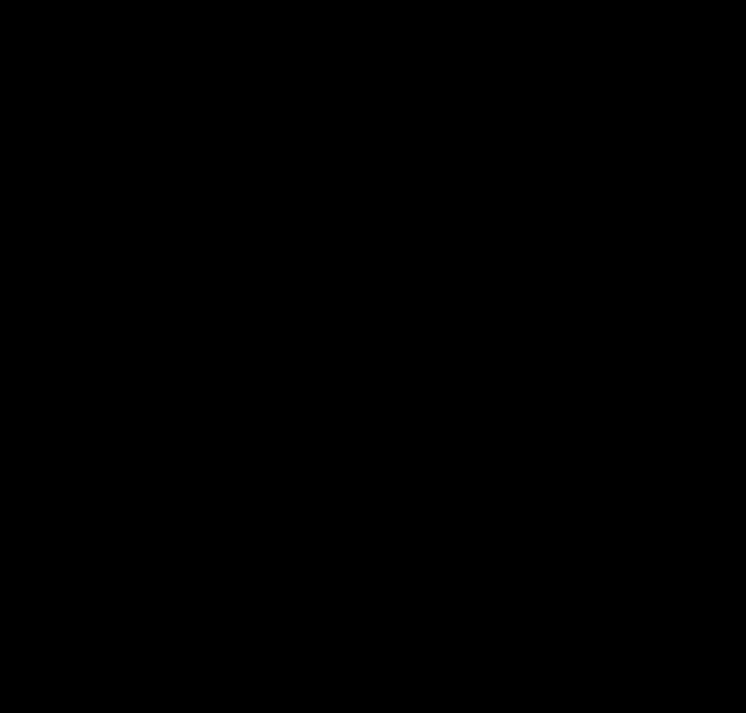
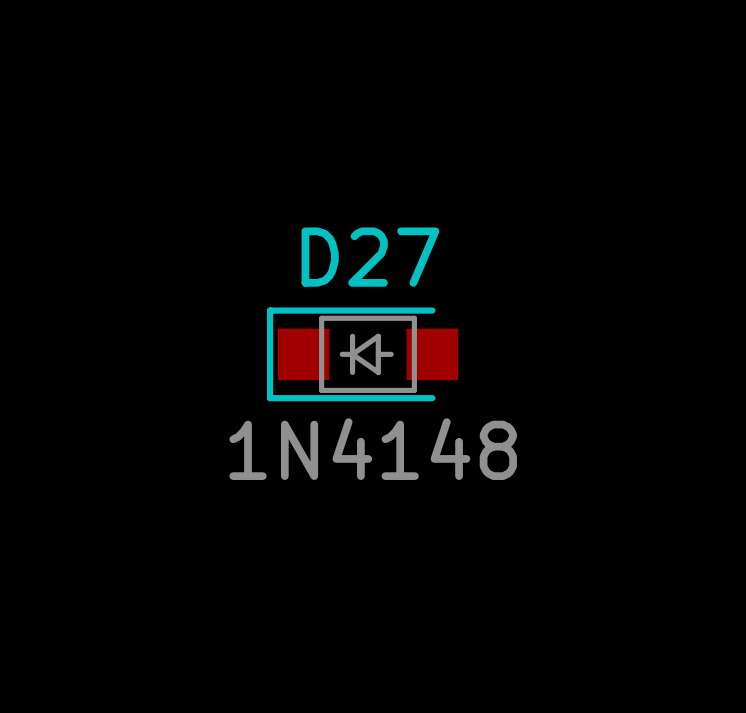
D27: none -> 1N4148 (362, 354)

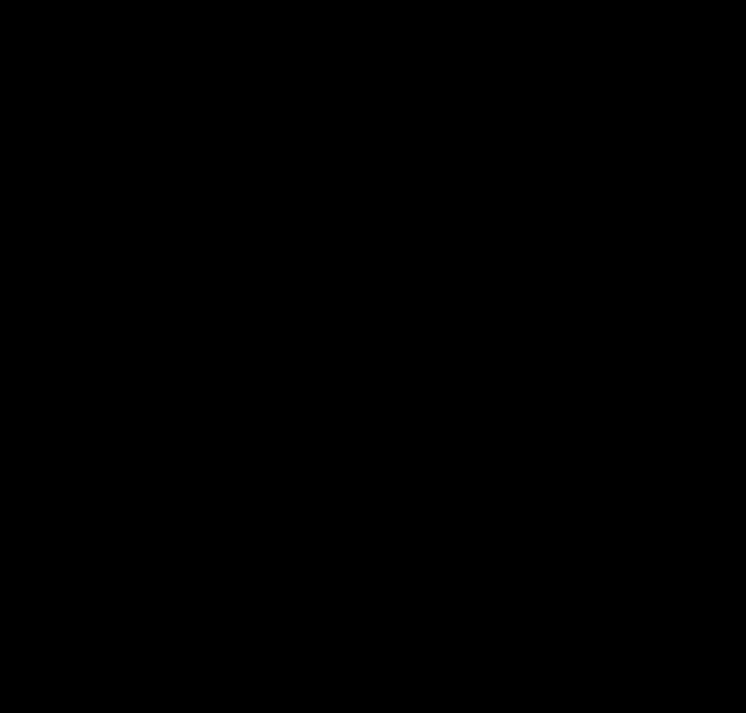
D27: 1N4148 (362, 354) -> none

